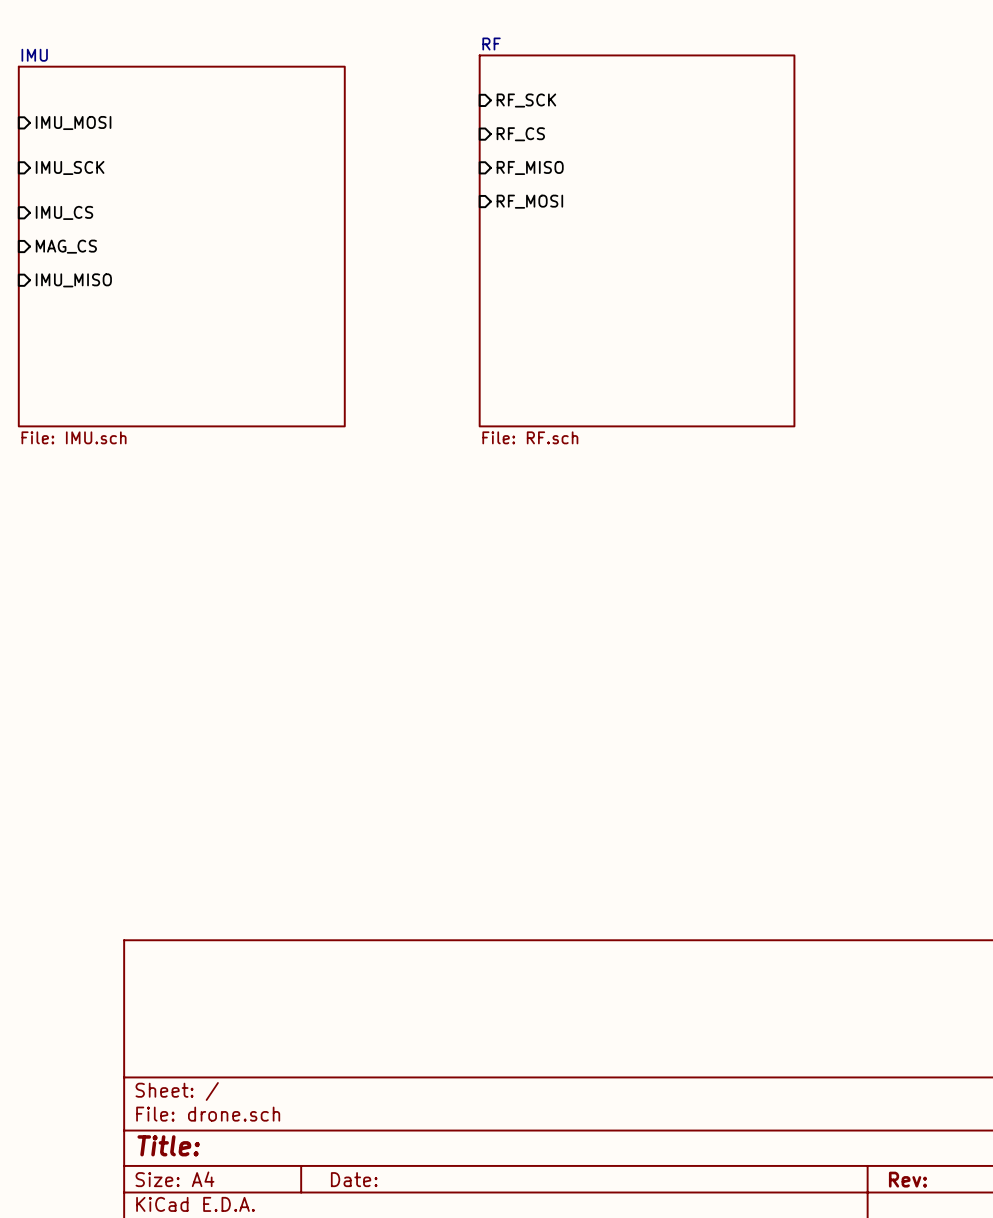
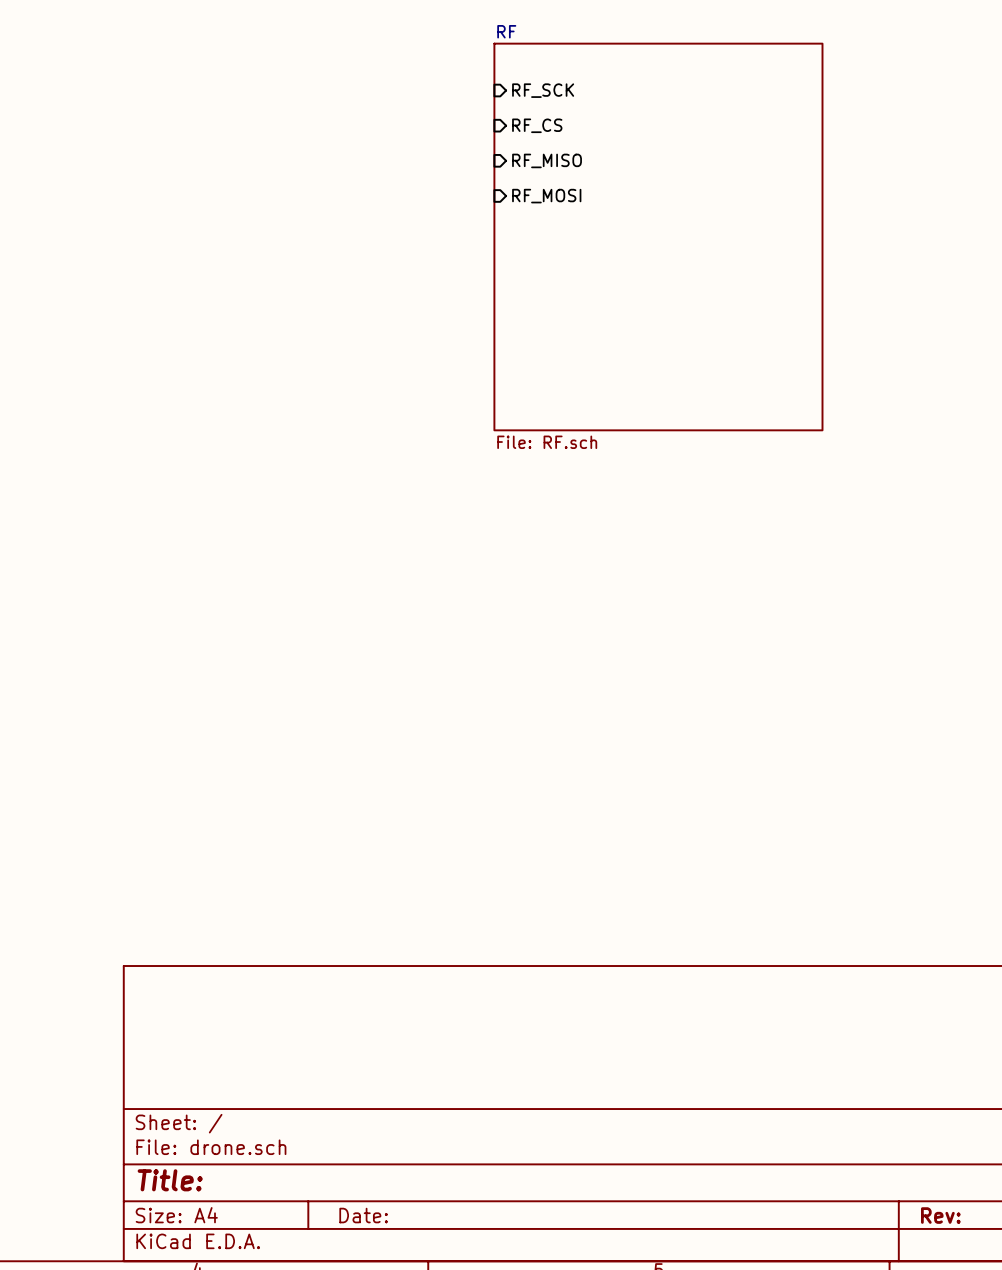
sheet pin: IMU_MOSI (73, 122) -> none
sheet pin: IMU_SCK (70, 167) -> none
sheet pin: IMU_CS (64, 212) -> none
sheet pin: MAG_CS (66, 246) -> none
sheet IMU: File: IMU.sch (181, 246) -> none
sheet pin: IMU_MISO (73, 280) -> none

